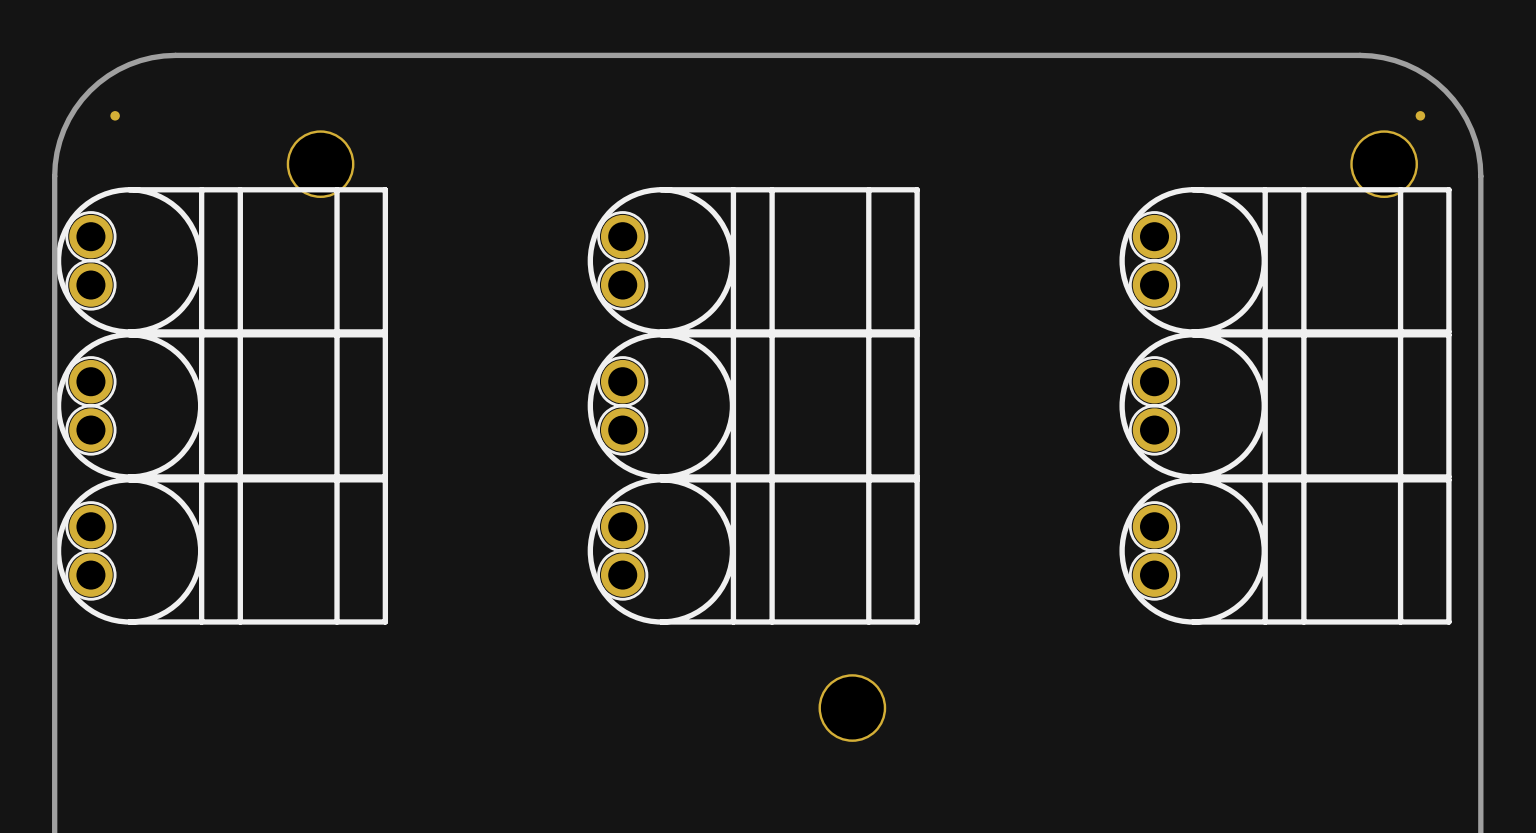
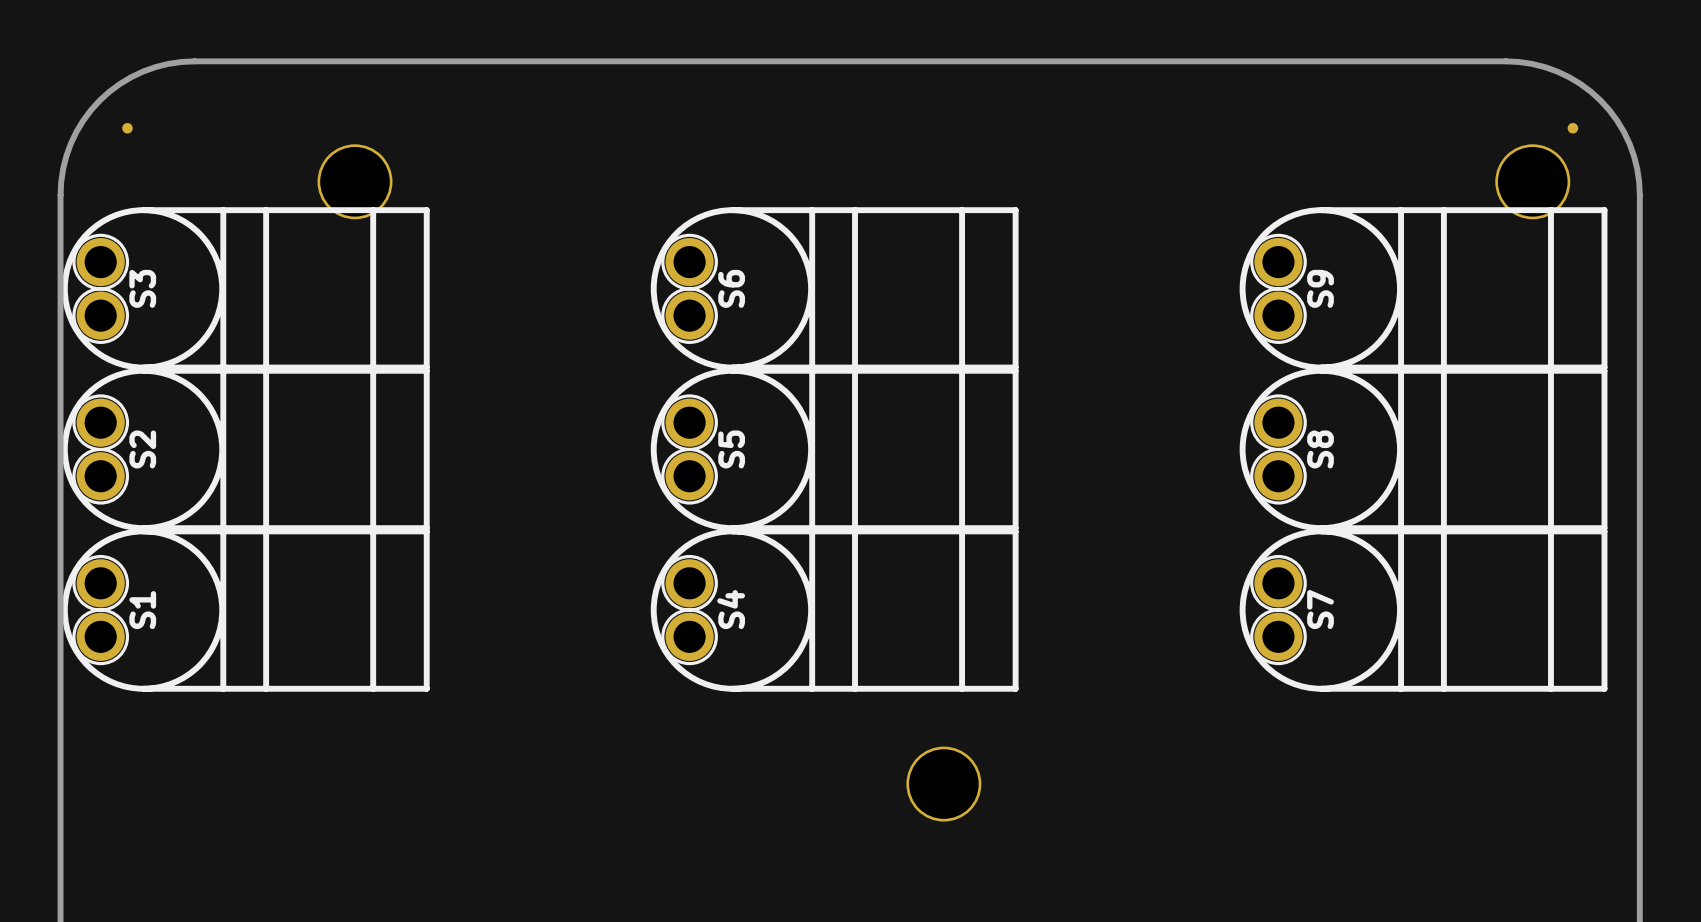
S3 name: none -> S3 (142, 288)
S6 name: none -> S6 (731, 288)
S9 name: none -> S9 (1320, 288)
S2 name: none -> S2 (142, 449)
S5 name: none -> S5 (731, 449)
S8 name: none -> S8 (1320, 449)
S1 name: none -> S1 (142, 610)
S4 name: none -> S4 (731, 609)
S7 name: none -> S7 (1320, 609)

